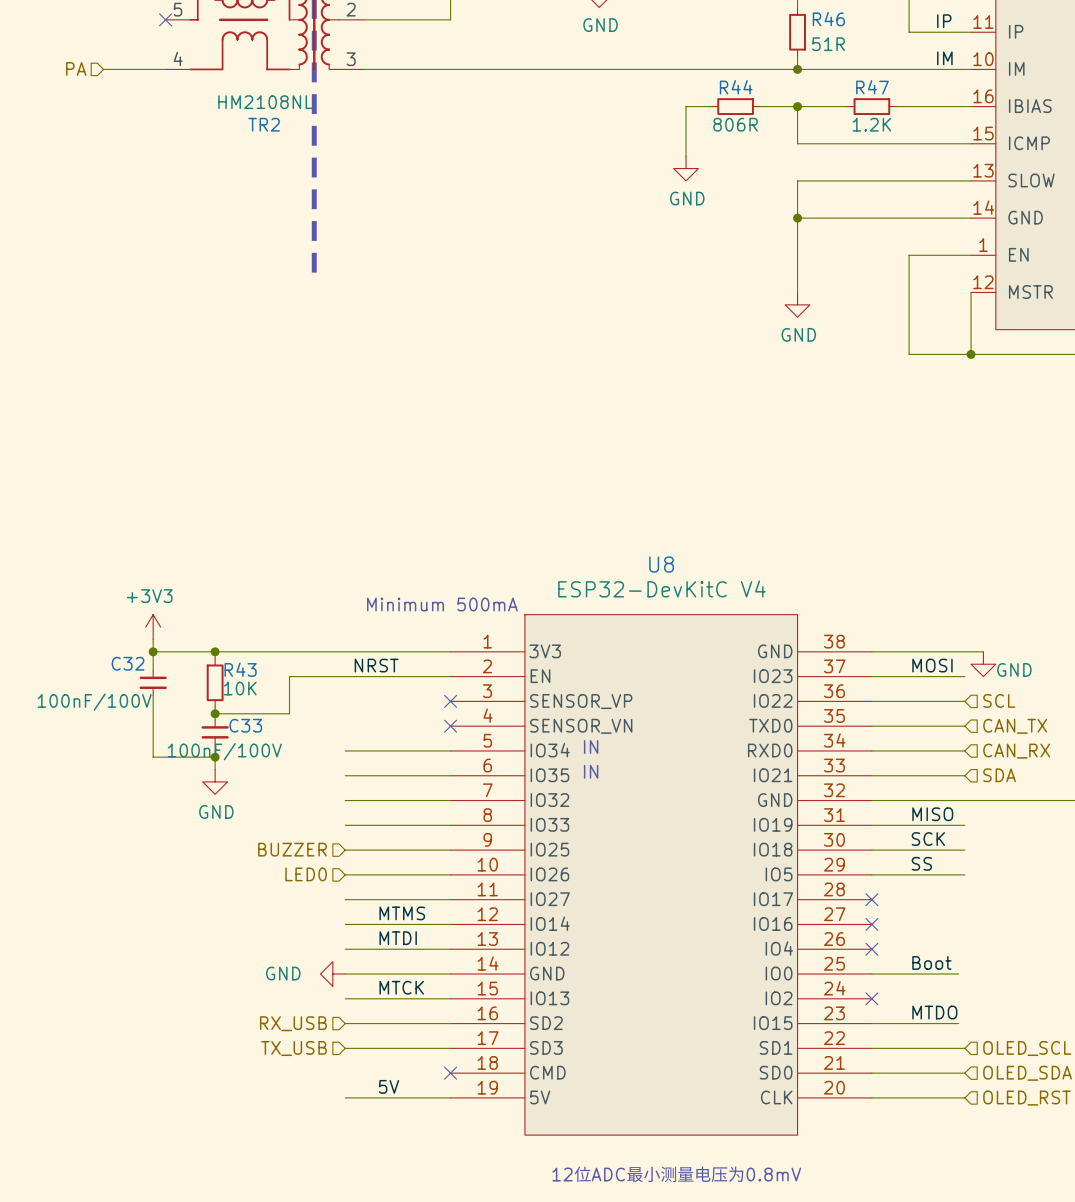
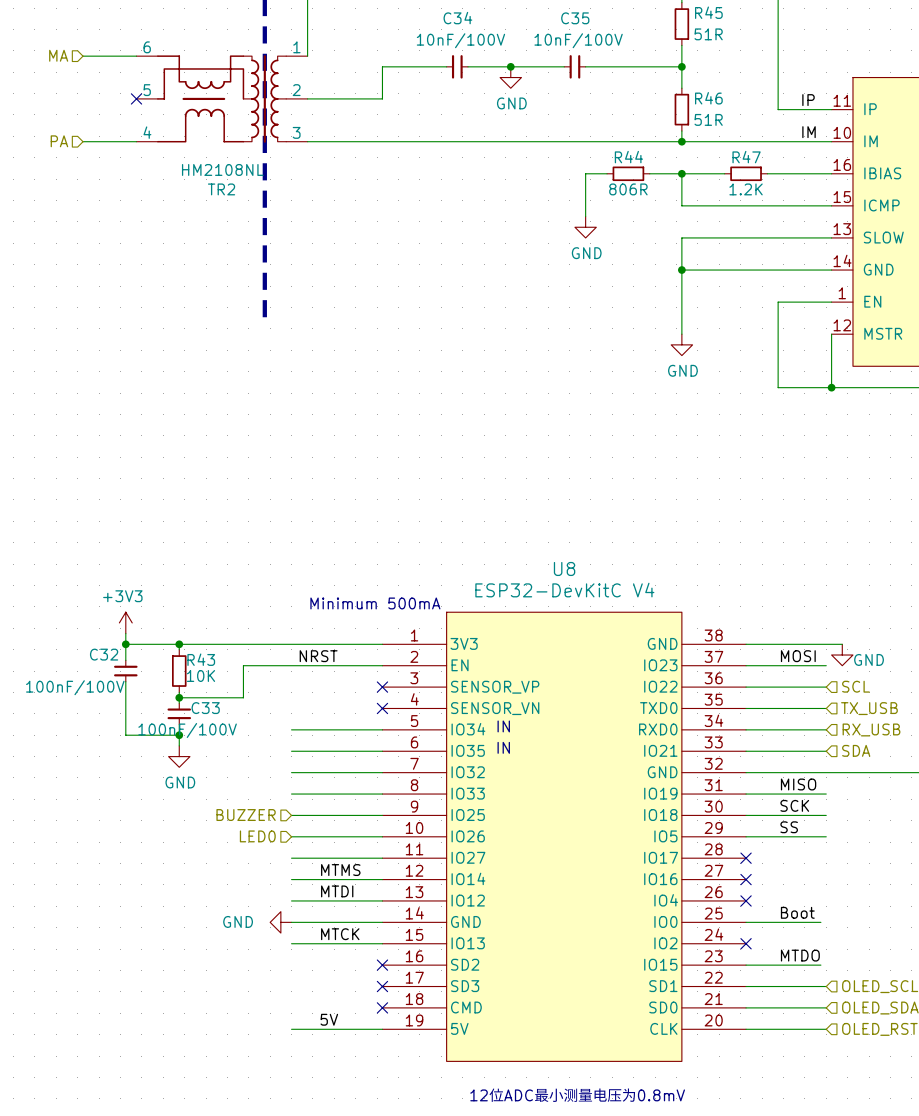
hierarchical label: CAN_TX (1015, 726) -> TX_USB (869, 708)
hierarchical label: CAN_RX (1016, 751) -> RX_USB (871, 729)
hierarchical label: RX_USB (293, 1023) -> none
wire: (345, 1023) (450, 1023) -> none
no-connect mark: none -> (382, 965)
hierarchical label: TX_USB (294, 1048) -> none
wire: (345, 1048) (450, 1048) -> none
no-connect mark: none -> (382, 986)

